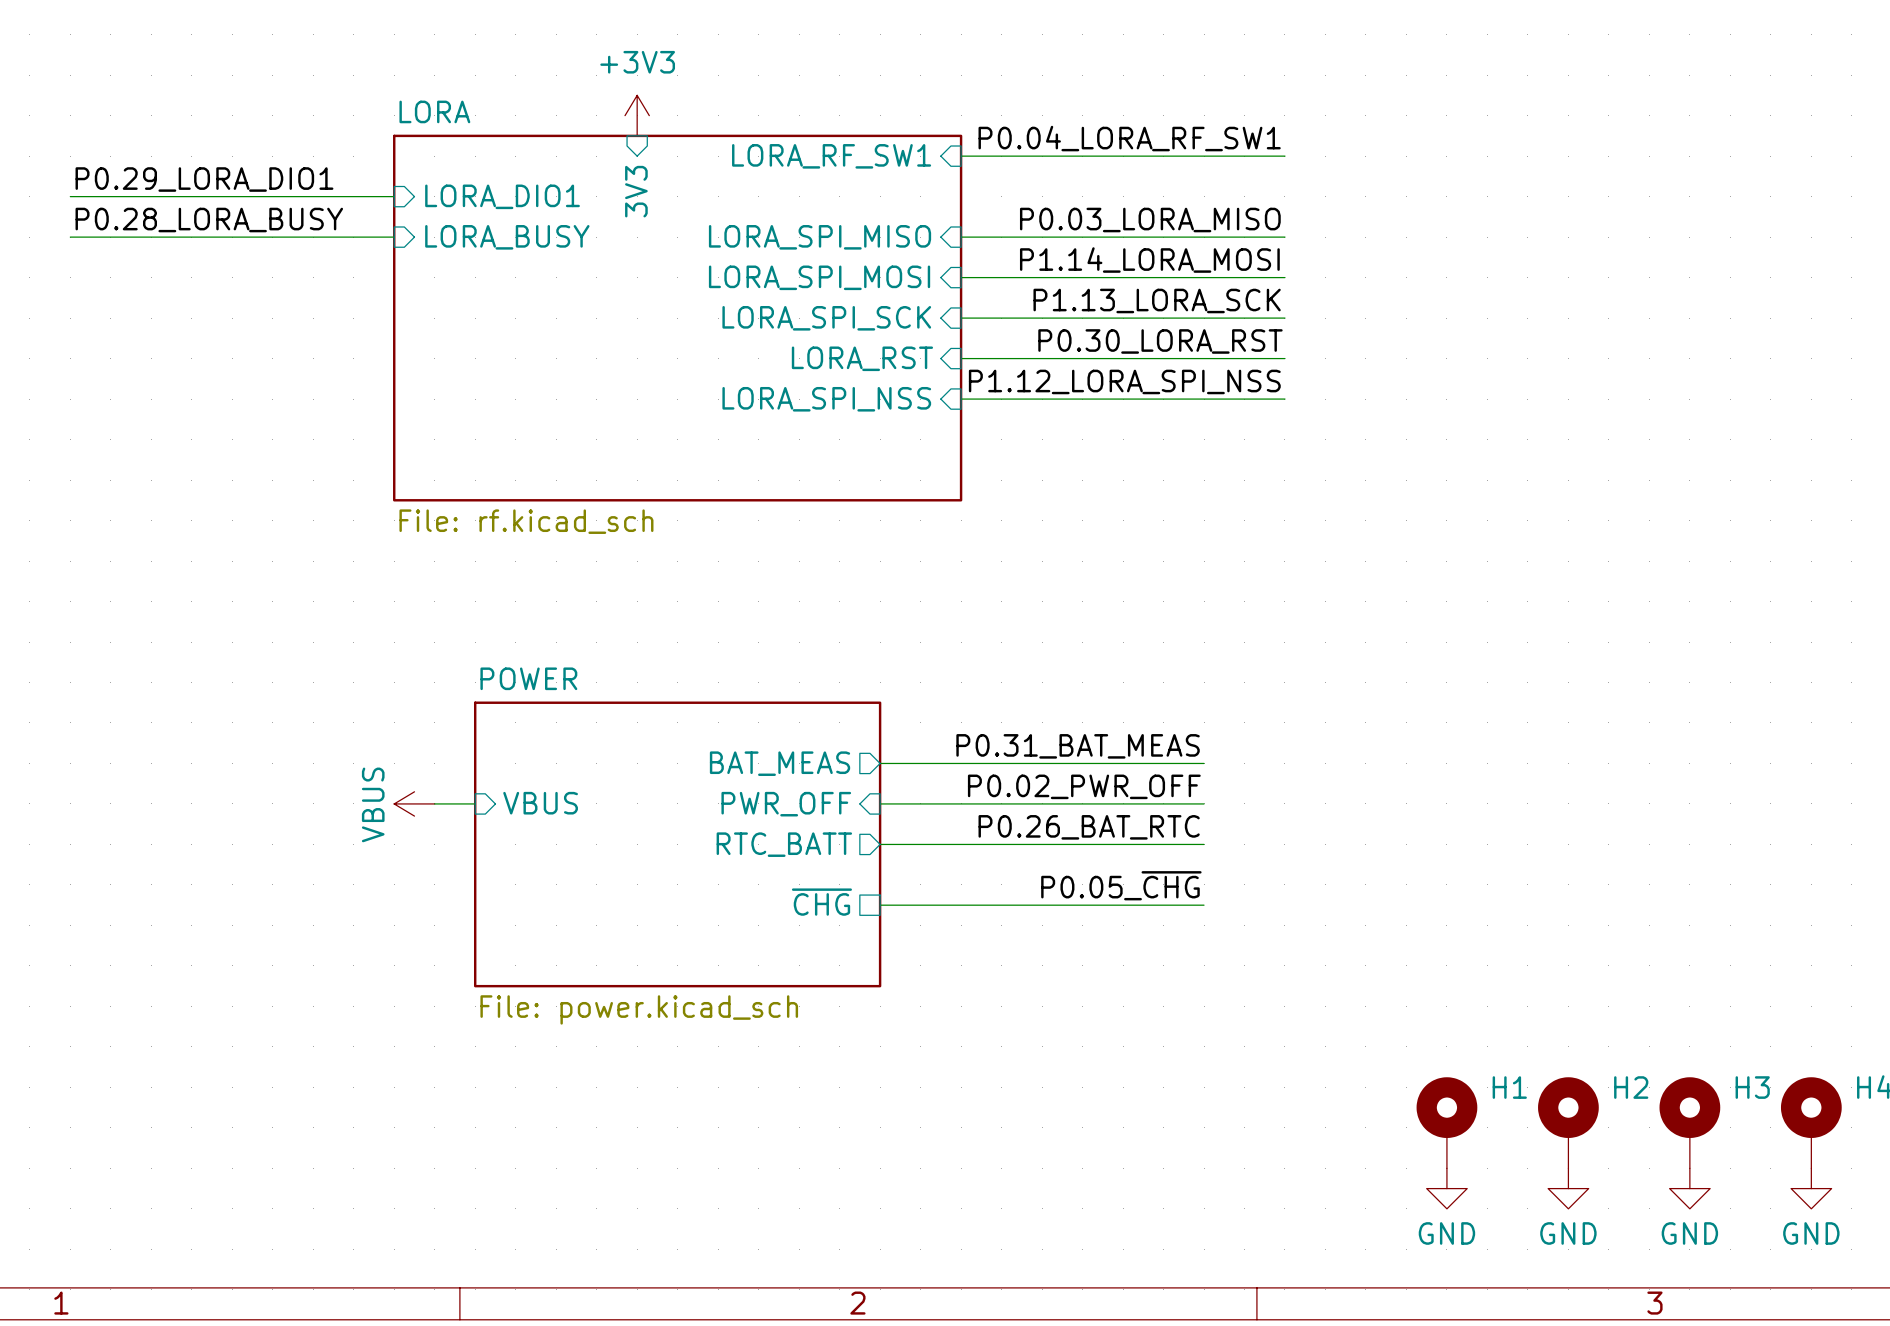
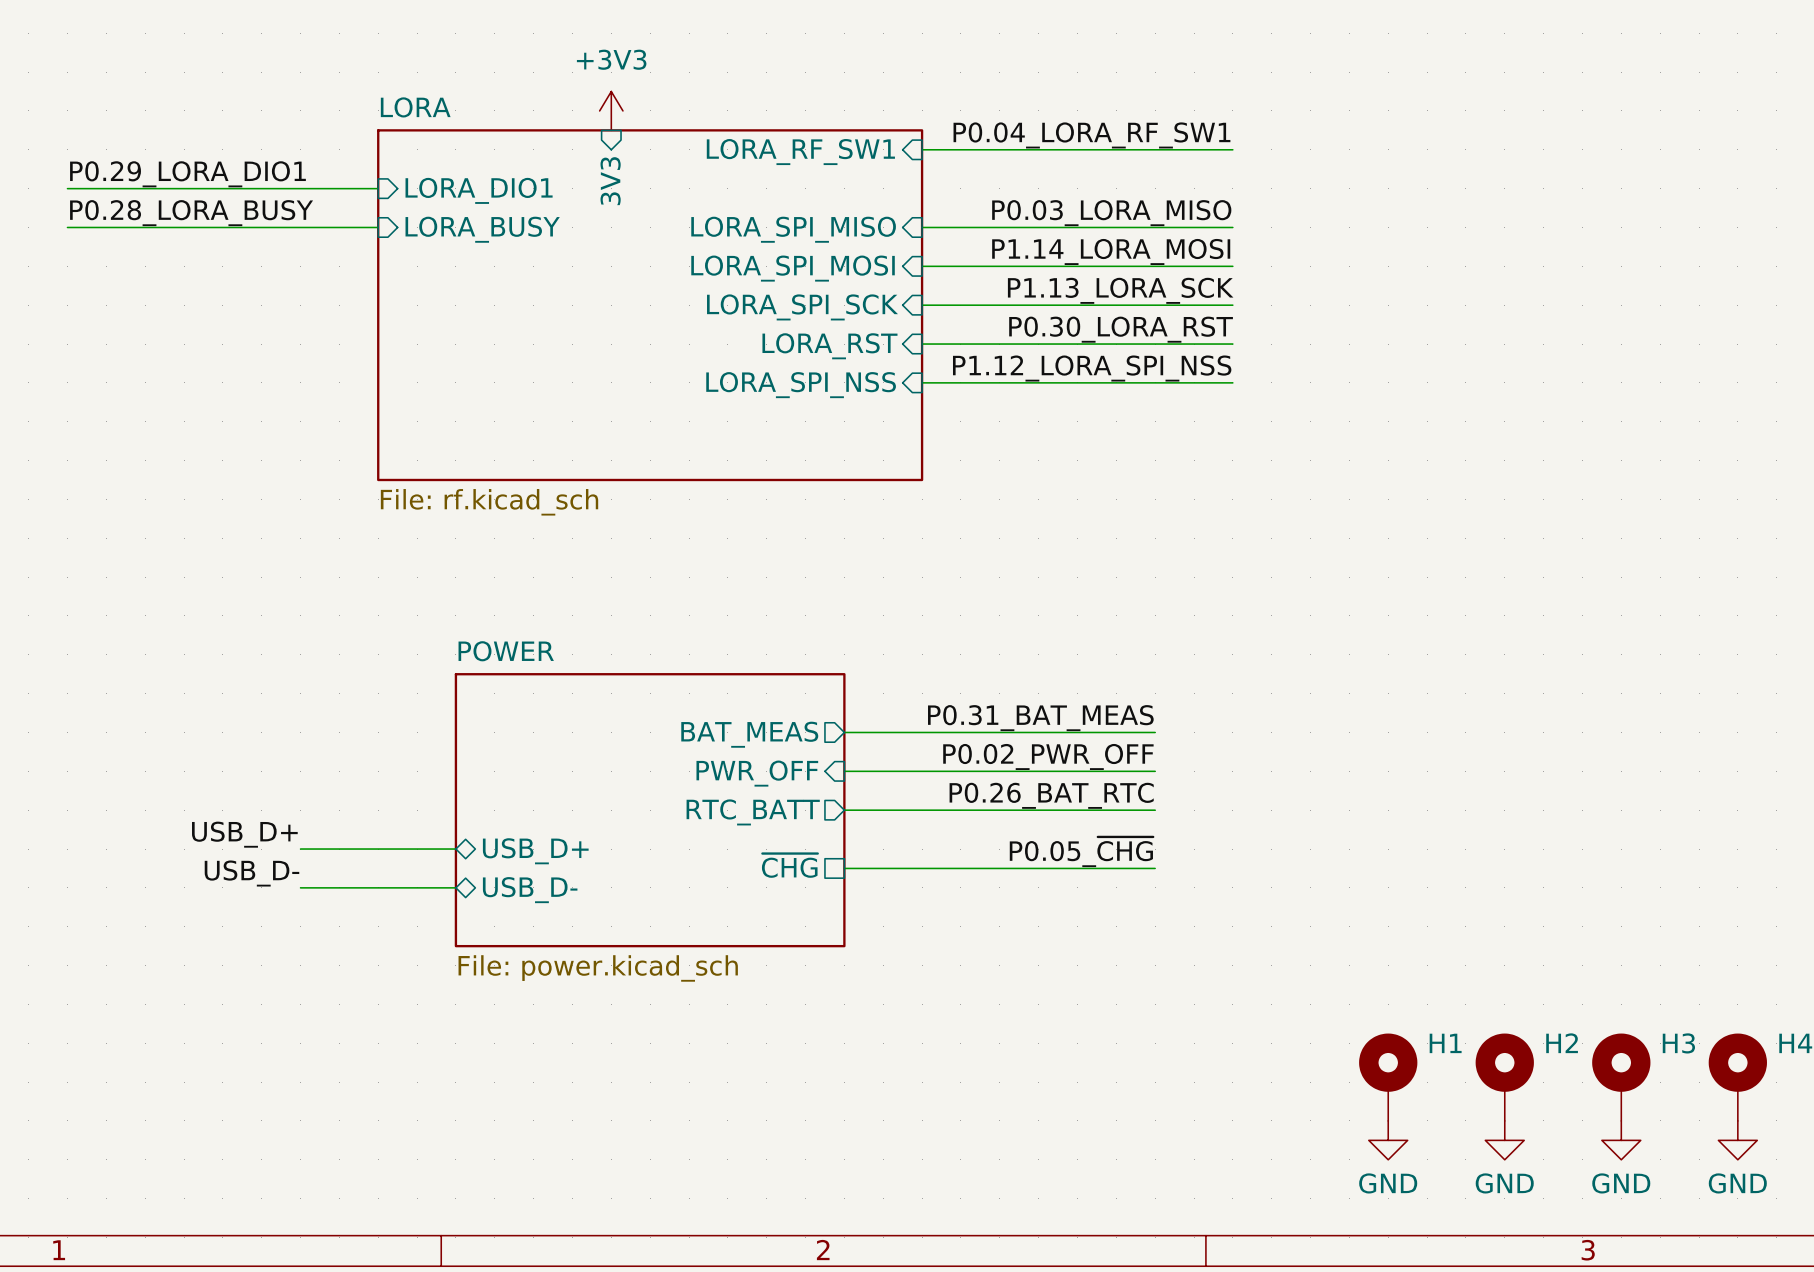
power symbol: VBUS (414, 803) -> none
wire: (434, 803) (475, 803) -> none
sheet pin: VBUS (540, 803) -> none
label: none -> USB_D+ (244, 834)
wire: none -> (300, 849) (455, 849)
sheet pin: none -> USB_D+ (535, 851)
label: none -> USB_D- (251, 873)
wire: none -> (300, 887) (455, 887)
sheet pin: none -> USB_D- (530, 890)

